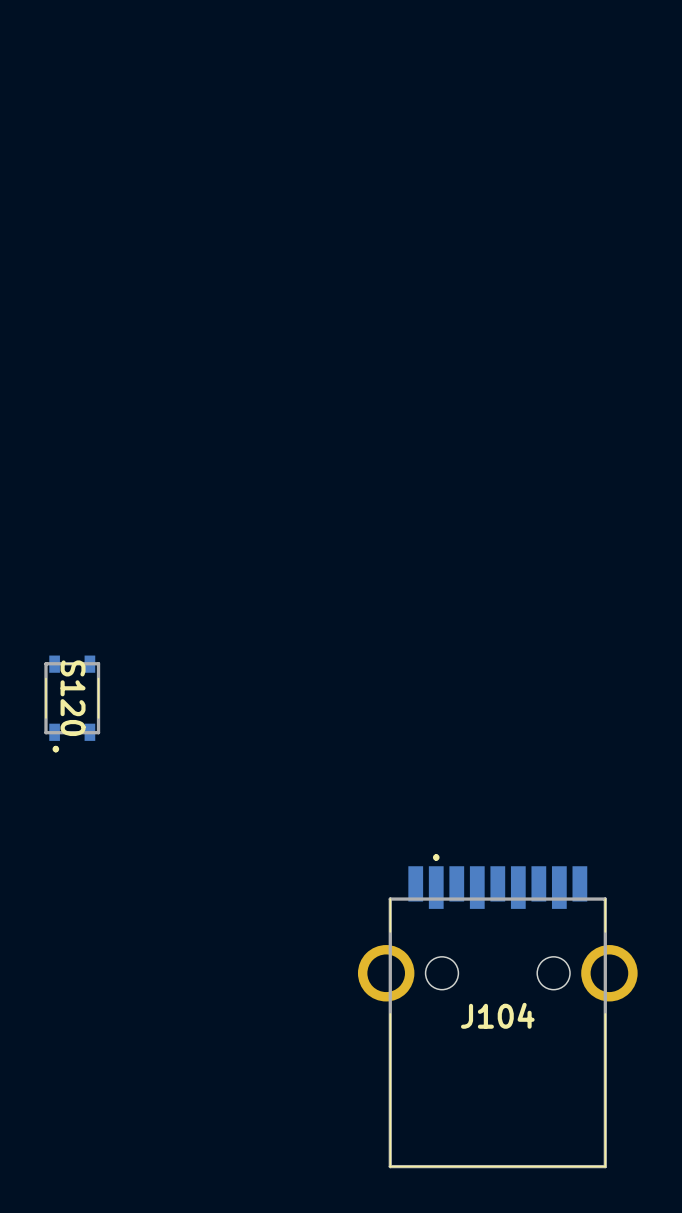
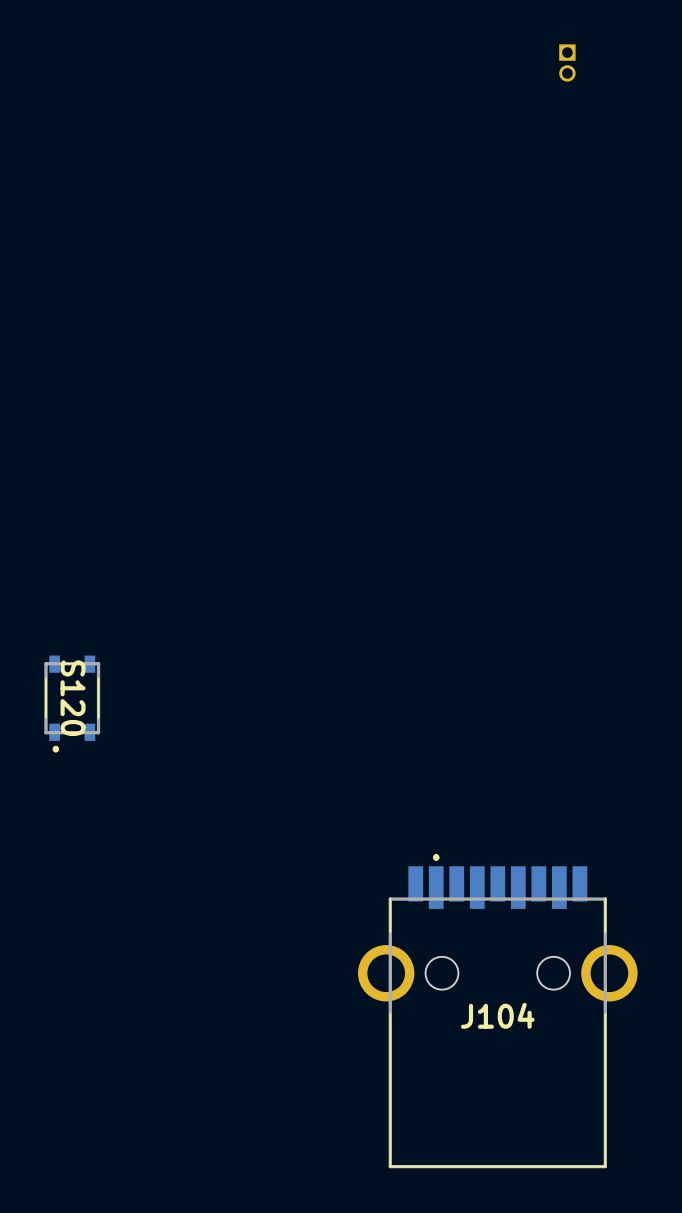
part: none -> (567, 62)

